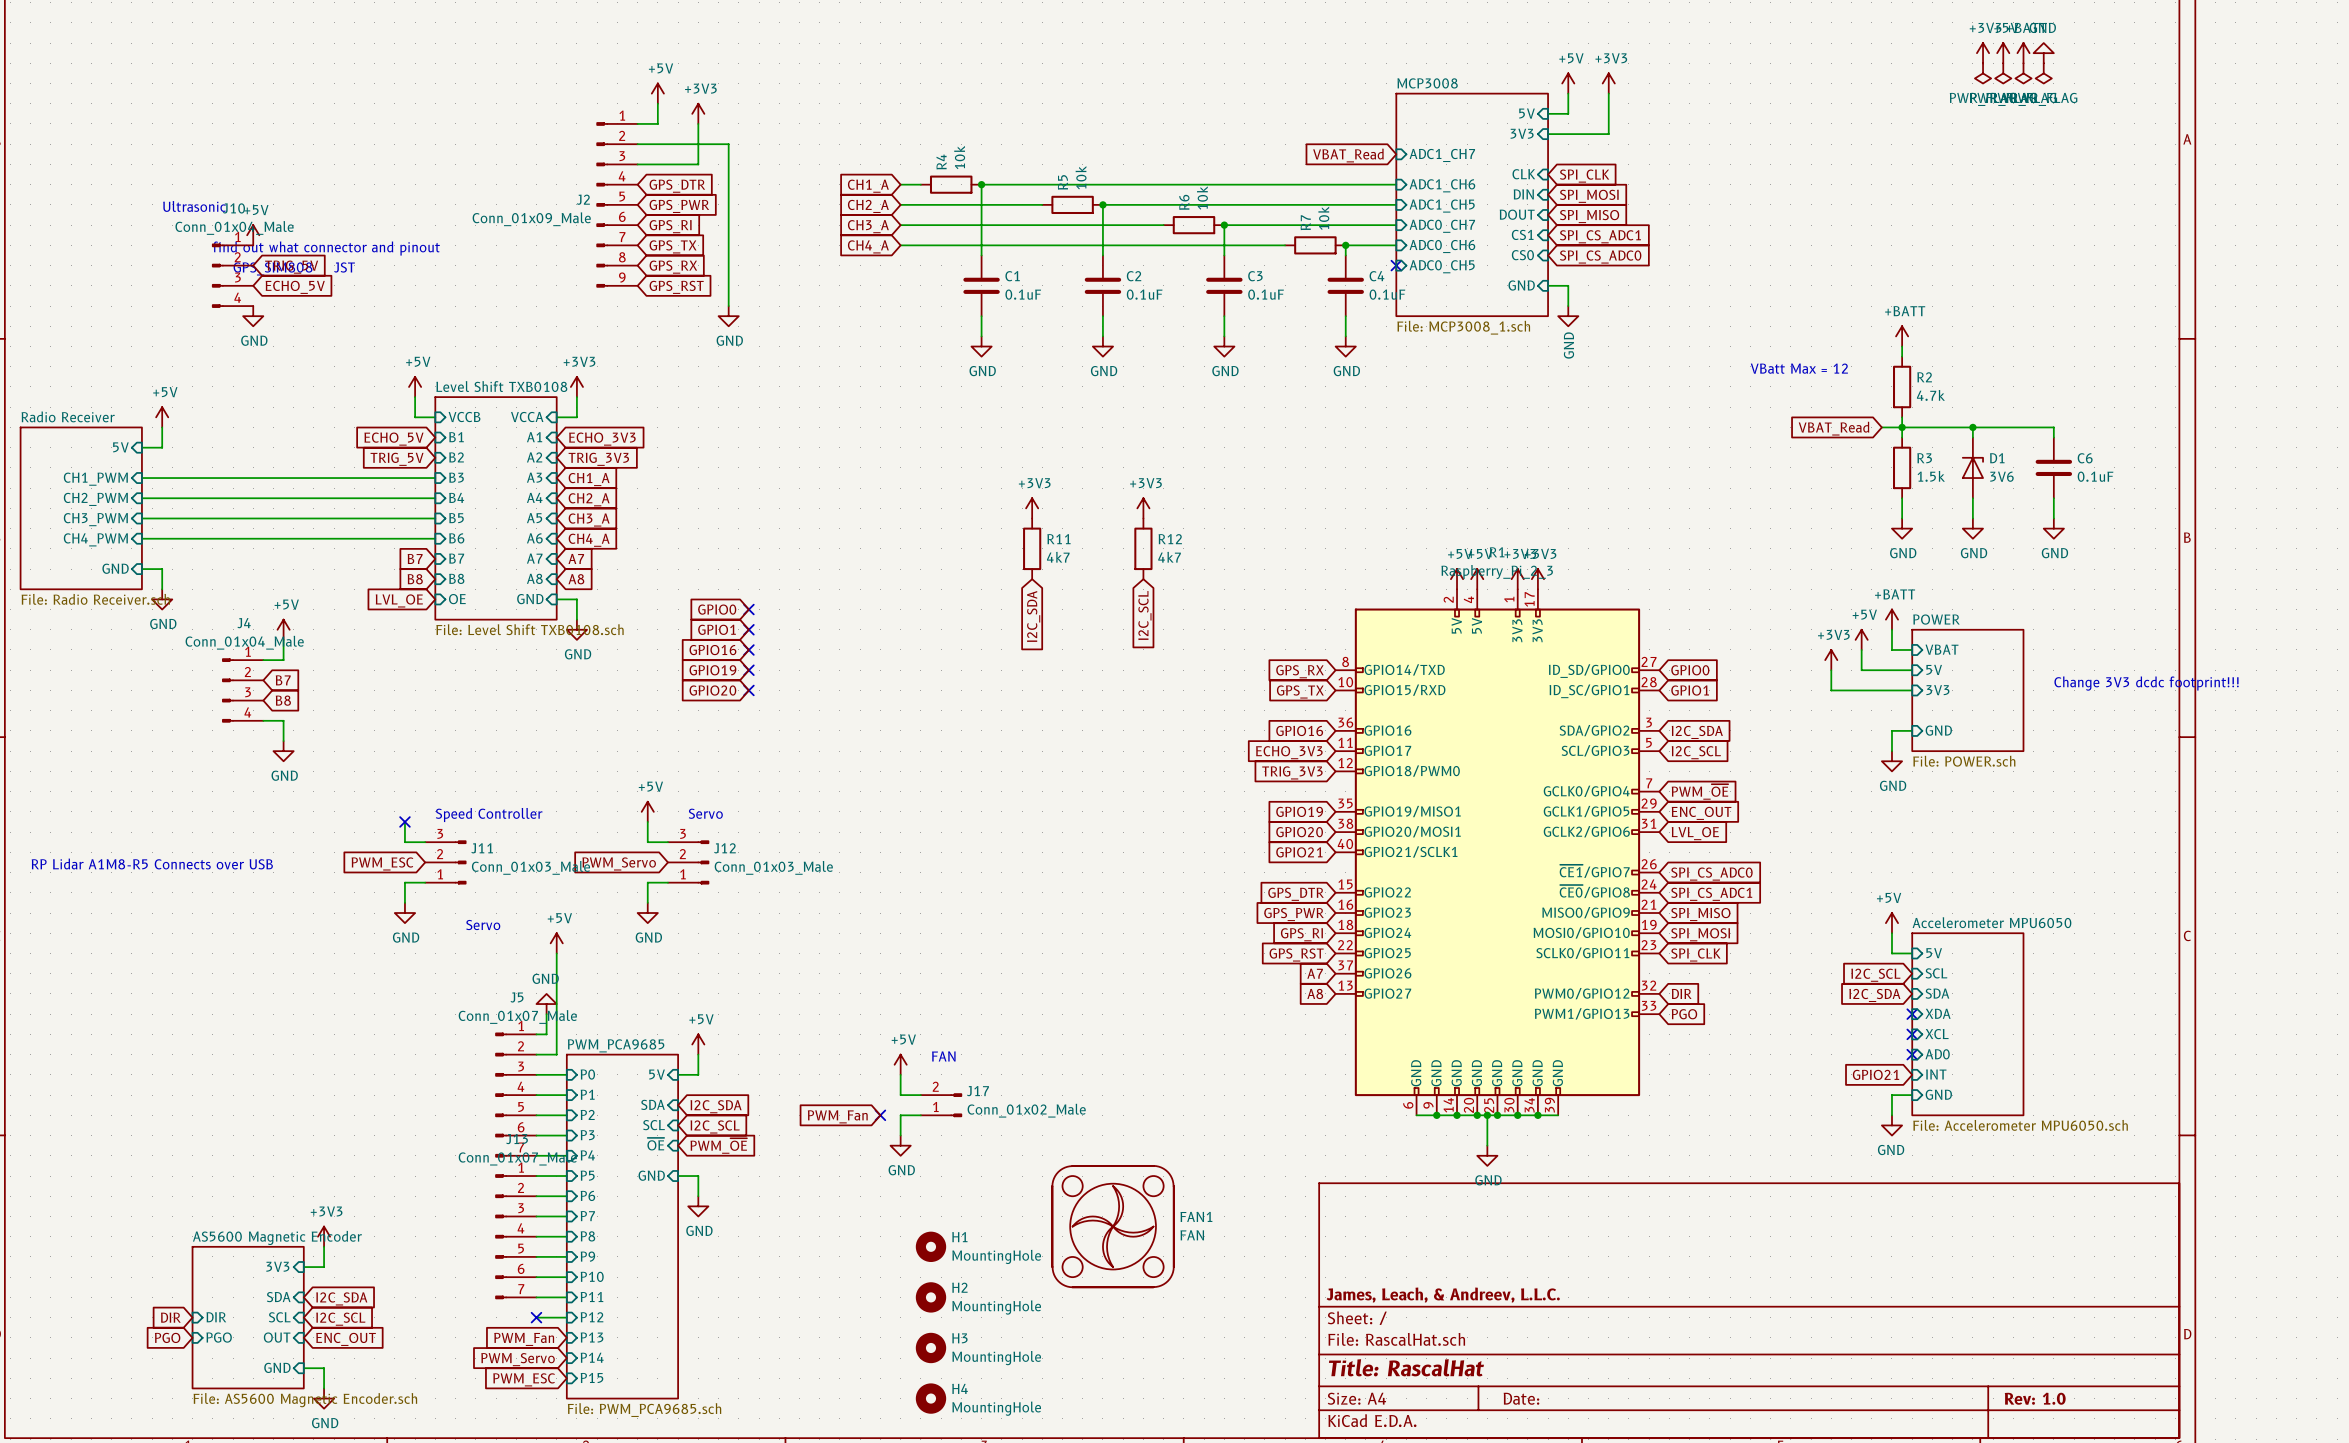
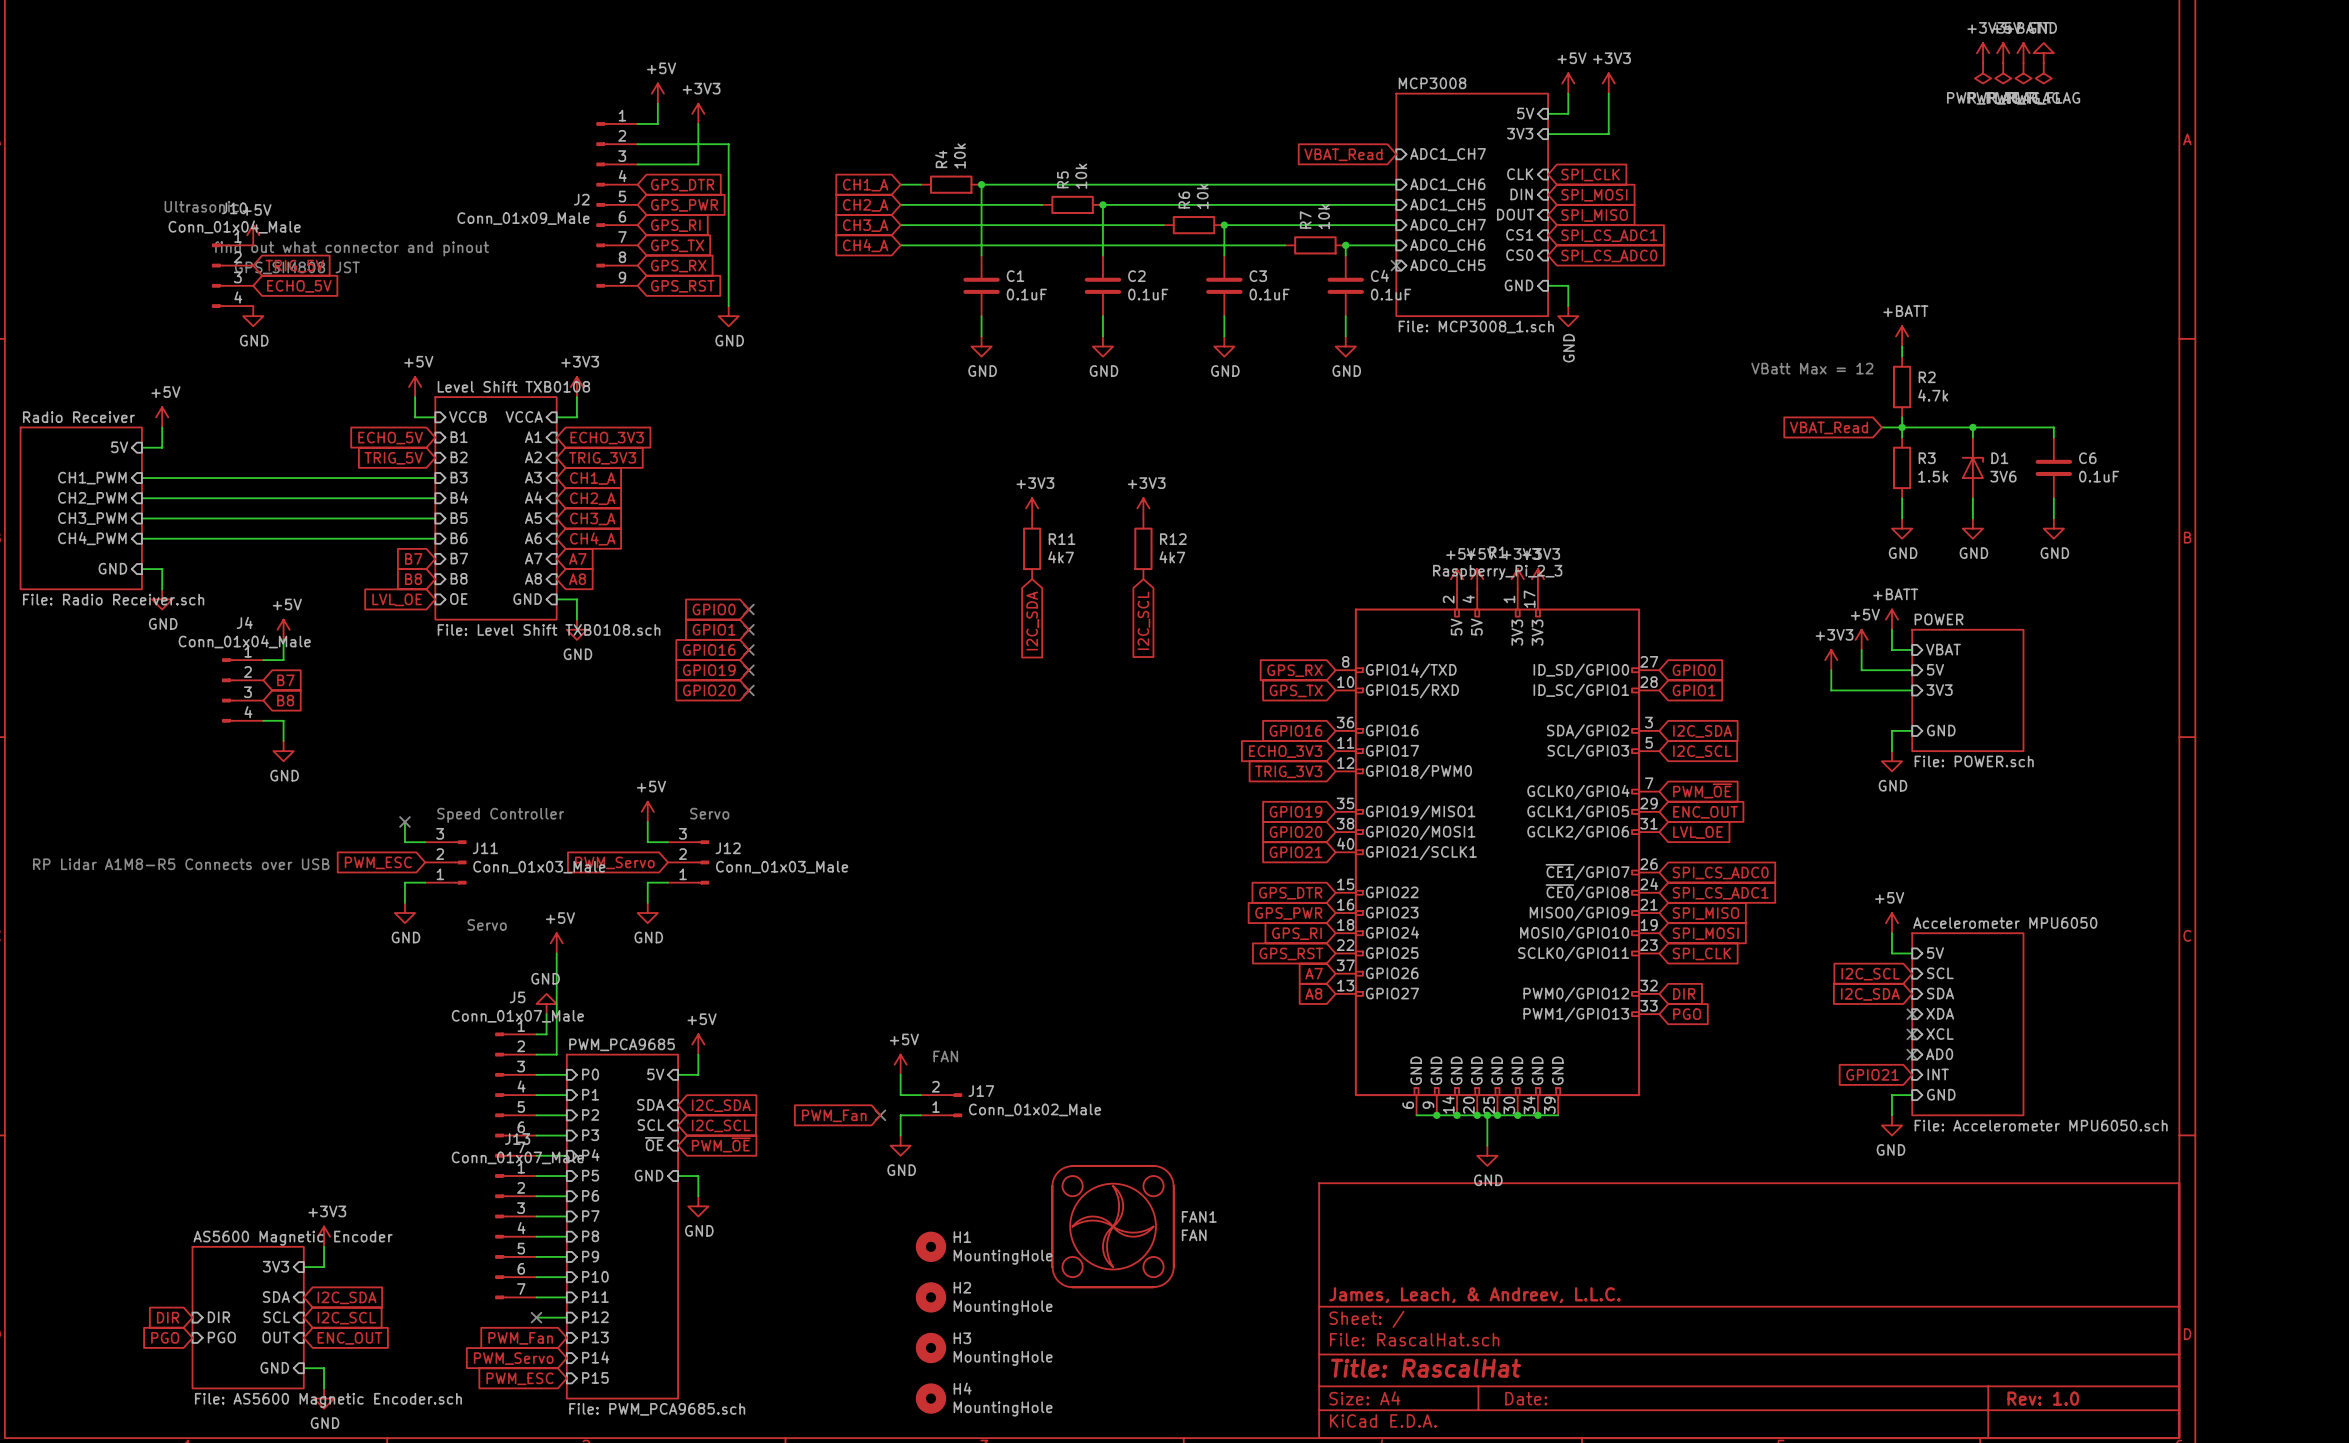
text: Change 3V3 dcdc footprint!!! (2146, 683) -> none

